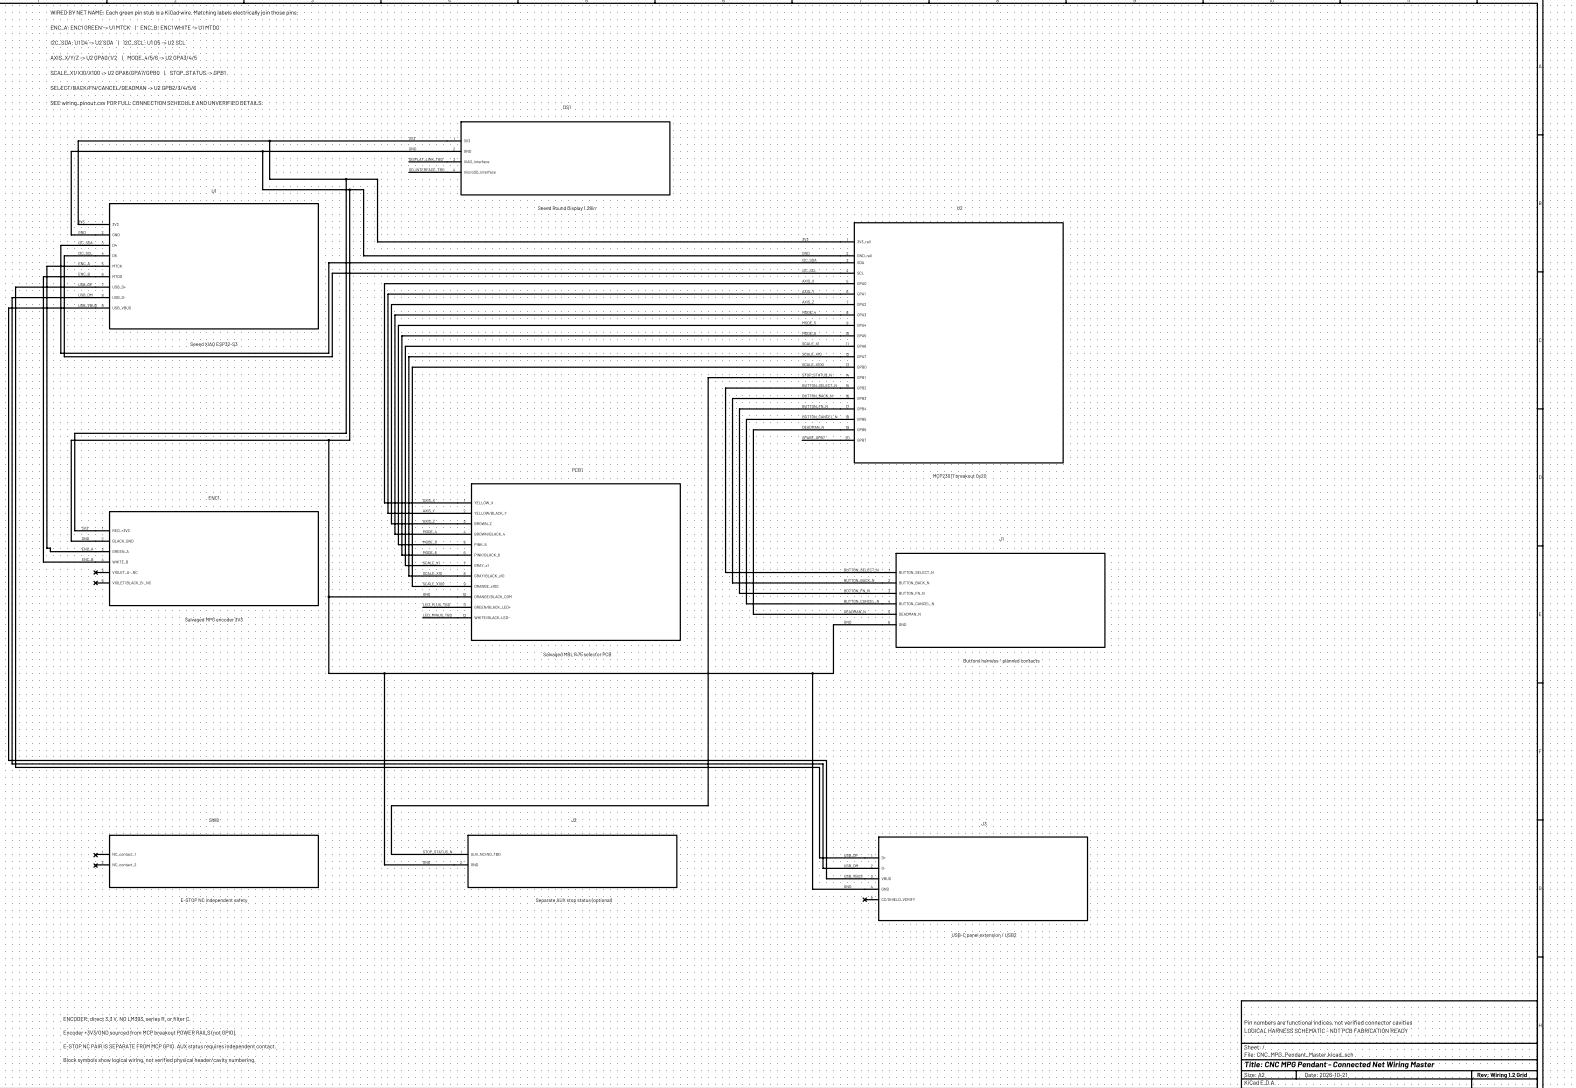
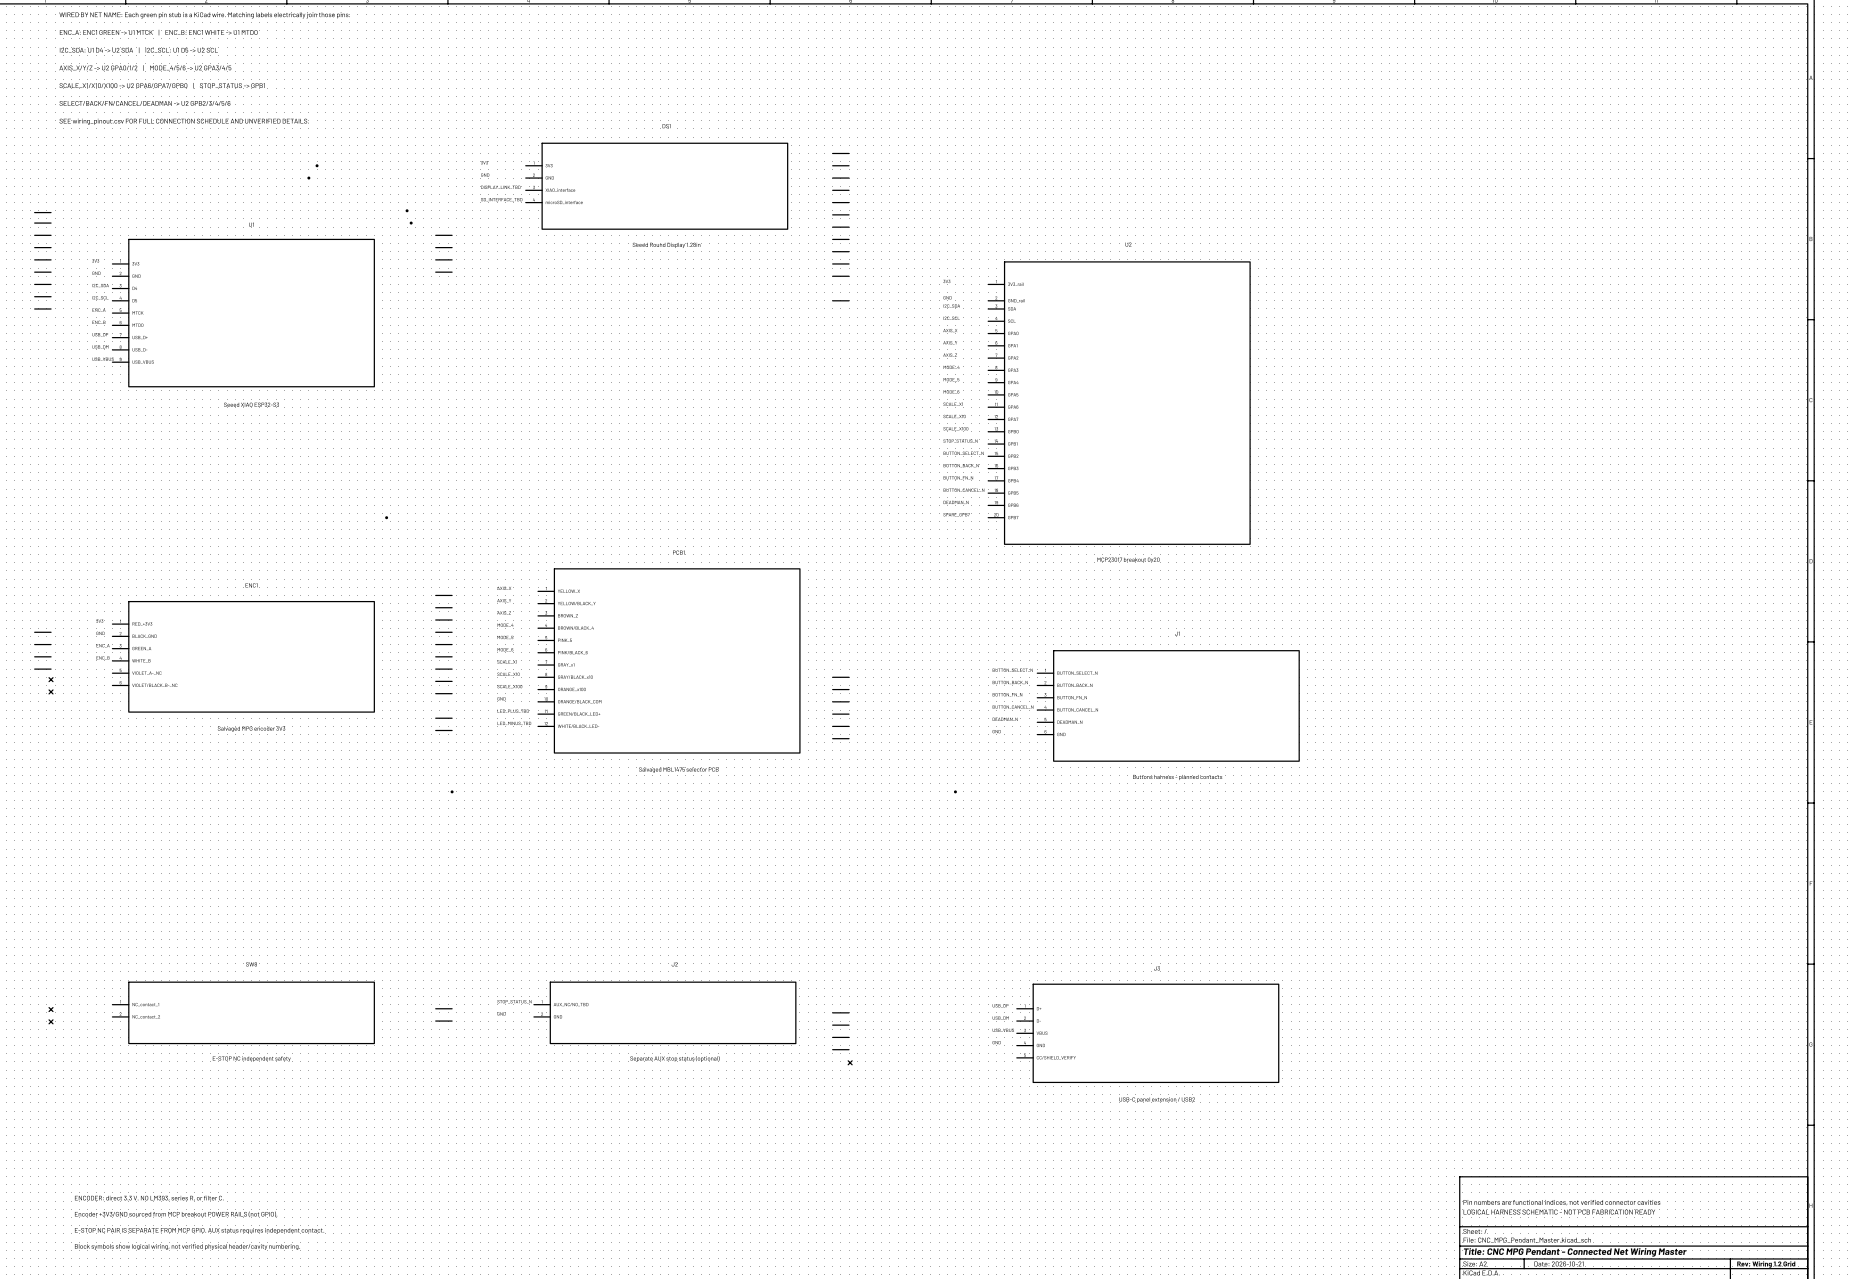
wire: none -> (832, 153) (849, 153)
wire: (269, 140) (269, 179) (377, 179) (377, 241) (840, 241) -> none
wire: (447, 140) (78, 140) (78, 224) (95, 224) -> none
wire: none -> (832, 165) (849, 165)
wire: (262, 151) (262, 189) (363, 189) (363, 255) (708, 255) -> none
wire: (447, 151) (71, 151) (71, 234) (95, 234) -> none
wire: none -> (832, 178) (849, 178)
wire: (408, 161) (447, 161) -> none
wire: none -> (832, 190) (849, 190)
wire: (408, 172) (447, 172) -> none
wire: none -> (832, 202) (849, 202)
wire: (346, 179) (346, 433) (74, 433) (74, 530) (95, 530) -> none
wire: none -> (34, 212) (51, 212)
wire: none -> (832, 214) (849, 214)
wire: none -> (34, 223) (51, 223)
wire: (349, 189) (349, 440) (71, 440) (71, 541) (95, 541) -> none
wire: none -> (832, 227) (849, 227)
wire: none -> (34, 235) (51, 235)
wire: none -> (435, 235) (452, 235)
wire: none -> (832, 239) (849, 239)
wire: none -> (34, 247) (51, 247)
wire: none -> (435, 247) (452, 247)
wire: none -> (832, 251) (849, 251)
wire: none -> (34, 259) (51, 259)
wire: none -> (435, 259) (452, 259)
wire: none -> (832, 263) (849, 263)
wire: none -> (34, 272) (51, 272)
wire: none -> (435, 272) (452, 272)
wire: none -> (832, 276) (849, 276)
wire: none -> (34, 284) (51, 284)
wire: (95, 245) (60, 245) (60, 353) (328, 353) (328, 262) (840, 262) -> none
wire: none -> (34, 296) (51, 296)
wire: (95, 255) (64, 255) (64, 356) (332, 356) (332, 273) (840, 273) -> none
wire: (722, 255) (840, 255) -> none
wire: none -> (34, 308) (51, 308)
wire: (95, 266) (46, 266) (46, 548) (50, 548) (50, 551) (95, 551) -> none
wire: (95, 276) (43, 276) (43, 562) (95, 562) -> none
wire: (840, 283) (384, 283) (384, 502) (457, 502) -> none
wire: (95, 287) (15, 287) (15, 767) (819, 767) (819, 857) (864, 857) -> none
wire: (840, 294) (387, 294) (387, 513) (457, 513) -> none
wire: (95, 297) (12, 297) (12, 763) (823, 763) (823, 868) (864, 868) -> none
wire: (840, 304) (391, 304) (391, 523) (457, 523) -> none
wire: (95, 308) (8, 308) (8, 760) (826, 760) (826, 878) (864, 878) -> none
wire: (840, 314) (394, 314) (394, 534) (457, 534) -> none
wire: (840, 325) (398, 325) (398, 544) (457, 544) -> none
wire: (840, 335) (401, 335) (401, 555) (457, 555) -> none
wire: (840, 346) (405, 346) (405, 565) (457, 565) -> none
wire: (840, 356) (408, 356) (408, 576) (457, 576) -> none
wire: (840, 367) (412, 367) (412, 586) (457, 586) -> none
wire: (840, 377) (708, 377) (708, 805) (391, 805) (391, 854) (454, 854) -> none
wire: (840, 388) (725, 388) (725, 572) (882, 572) -> none
wire: (840, 398) (732, 398) (732, 582) (882, 582) -> none
wire: (840, 408) (739, 408) (739, 593) (882, 593) -> none
wire: (840, 419) (746, 419) (746, 603) (882, 603) -> none
wire: (840, 429) (753, 429) (753, 614) (882, 614) -> none
wire: (328, 440) (328, 673) (833, 673) (833, 624) (882, 624) -> none
wire: (802, 440) (840, 440) -> none
wire: none -> (435, 595) (452, 595)
wire: none -> (435, 607) (452, 607)
wire: none -> (435, 620) (452, 620)
wire: none -> (34, 632) (51, 632)
wire: none -> (435, 632) (452, 632)
wire: none -> (34, 644) (51, 644)
wire: none -> (435, 644) (452, 644)
wire: none -> (34, 656) (51, 656)
wire: none -> (435, 656) (452, 656)
wire: none -> (34, 669) (51, 669)
wire: none -> (435, 669) (452, 669)
no-connect mark: (95, 572) -> none
wire: none -> (832, 677) (849, 677)
no-connect mark: none -> (51, 679)
wire: none -> (435, 681) (452, 681)
no-connect mark: (95, 582) -> none
wire: none -> (832, 689) (849, 689)
no-connect mark: none -> (51, 691)
wire: none -> (435, 693) (452, 693)
wire: (328, 596) (457, 596) -> none
wire: none -> (832, 701) (849, 701)
wire: (422, 607) (457, 607) -> none
wire: none -> (832, 714) (849, 714)
wire: none -> (435, 718) (452, 718)
wire: (422, 617) (457, 617) -> none
wire: none -> (832, 726) (849, 726)
wire: none -> (435, 730) (452, 730)
wire: none -> (832, 738) (849, 738)
wire: (384, 673) (384, 864) (454, 864) -> none
wire: (812, 673) (812, 889) (864, 889) -> none
no-connect mark: (95, 855) -> none
wire: none -> (435, 1008) (452, 1008)
no-connect mark: none -> (51, 1009)
wire: none -> (832, 1012) (849, 1012)
no-connect mark: (95, 865) -> none
wire: none -> (435, 1021) (452, 1021)
no-connect mark: none -> (51, 1021)
wire: none -> (832, 1025) (849, 1025)
wire: none -> (832, 1037) (849, 1037)
wire: none -> (832, 1049) (849, 1049)
no-connect mark: (864, 899) -> none
no-connect mark: none -> (850, 1062)

